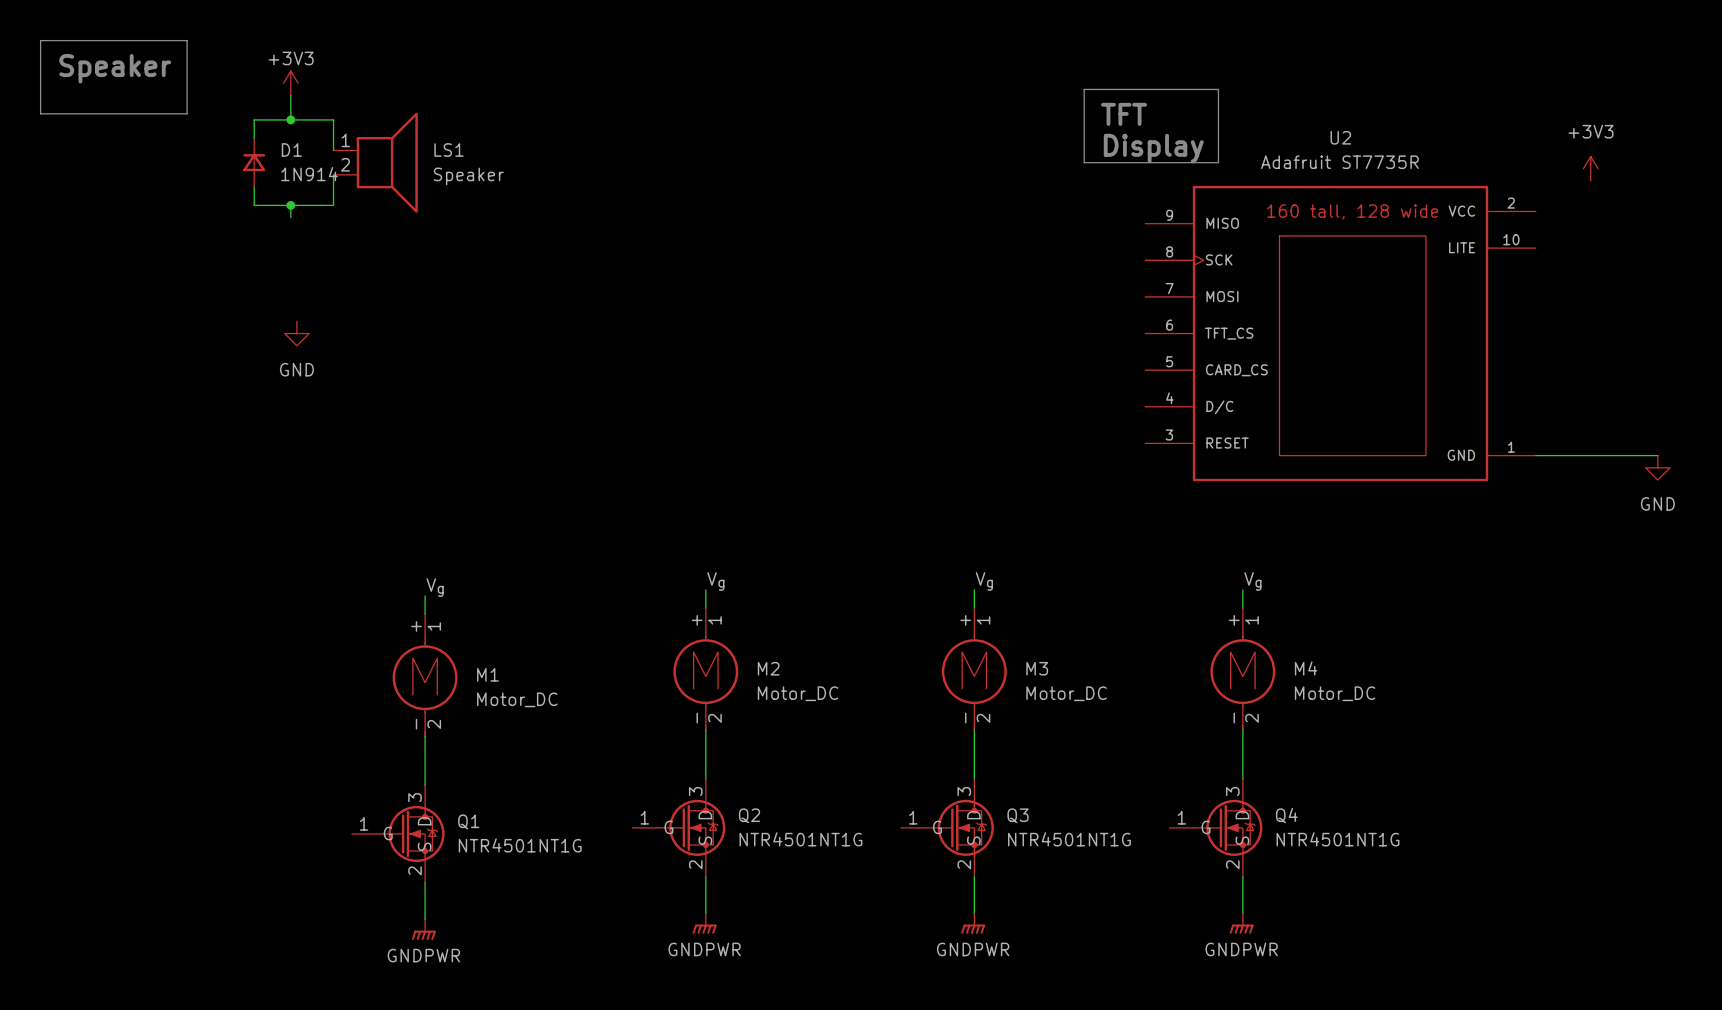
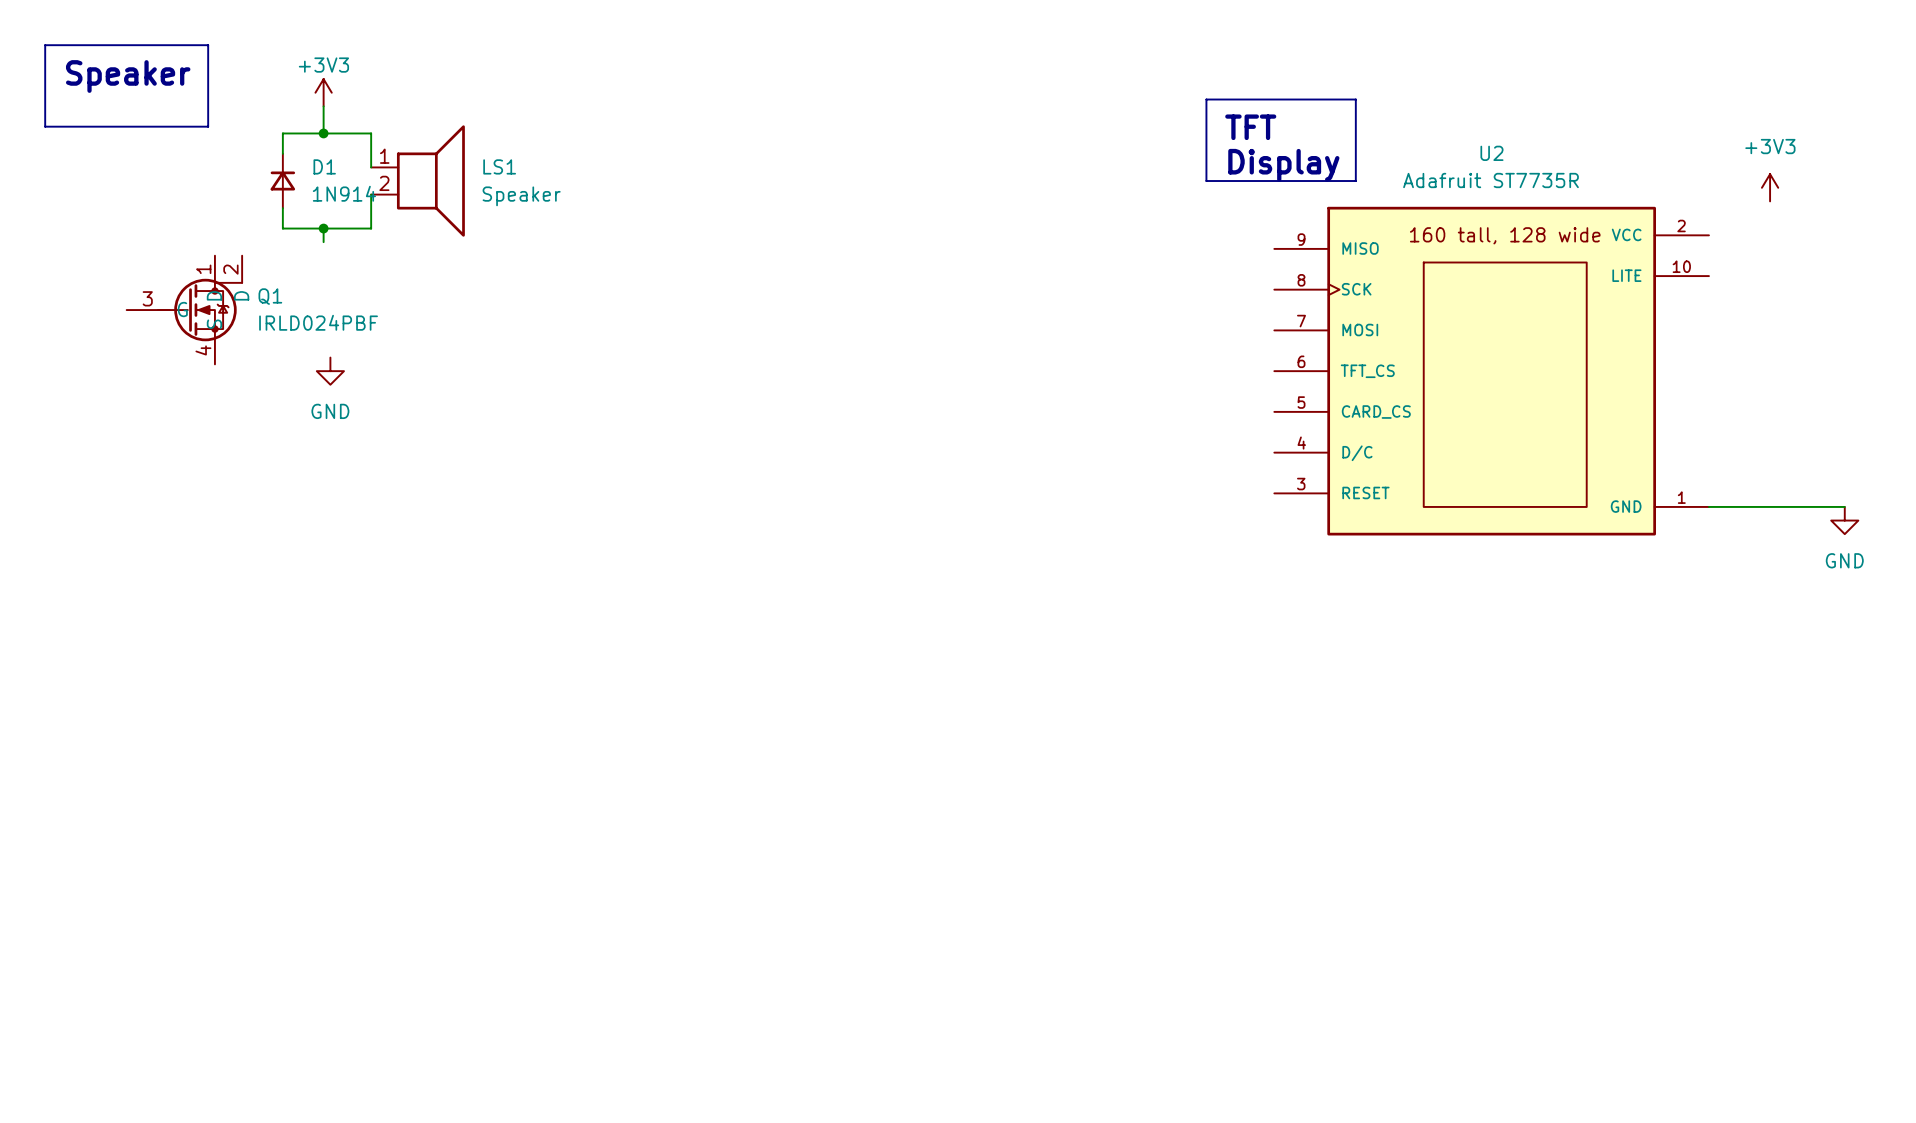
label: Vg (715, 581) -> none
label: Vg (984, 581) -> none
label: Vg (1252, 581) -> none
label: Vg (435, 587) -> none
wire: (705, 589) (705, 608) -> none
wire: (974, 589) (974, 608) -> none
wire: (1242, 589) (1242, 608) -> none
wire: (425, 595) (425, 614) -> none
M2: Motor_DC (705, 669) -> none
M3: Motor_DC (974, 669) -> none
M4: Motor_DC (1242, 669) -> none
M1: Motor_DC (425, 675) -> none
wire: (705, 730) (705, 779) -> none
wire: (974, 730) (974, 779) -> none
wire: (1242, 730) (1242, 779) -> none
wire: (425, 736) (425, 785) -> none
Q1 symbol: [351, 785, 445, 883] -> [126, 255, 243, 365]
Q2: NTR4501NT1G (678, 827) -> none
Q3: NTR4501NT1G (947, 827) -> none
Q4: NTR4501NT1G (1216, 827) -> none
Q1 value: NTR4501NT1G (520, 845) -> IRLD024PBF (318, 322)
wire: (705, 876) (705, 913) -> none
wire: (974, 876) (974, 913) -> none
wire: (1242, 876) (1242, 913) -> none
wire: (425, 882) (425, 919) -> none
power symbol: GNDPWR (704, 923) -> none
power symbol: GNDPWR (973, 923) -> none
power symbol: GNDPWR (1241, 923) -> none
power symbol: GNDPWR (423, 929) -> none

